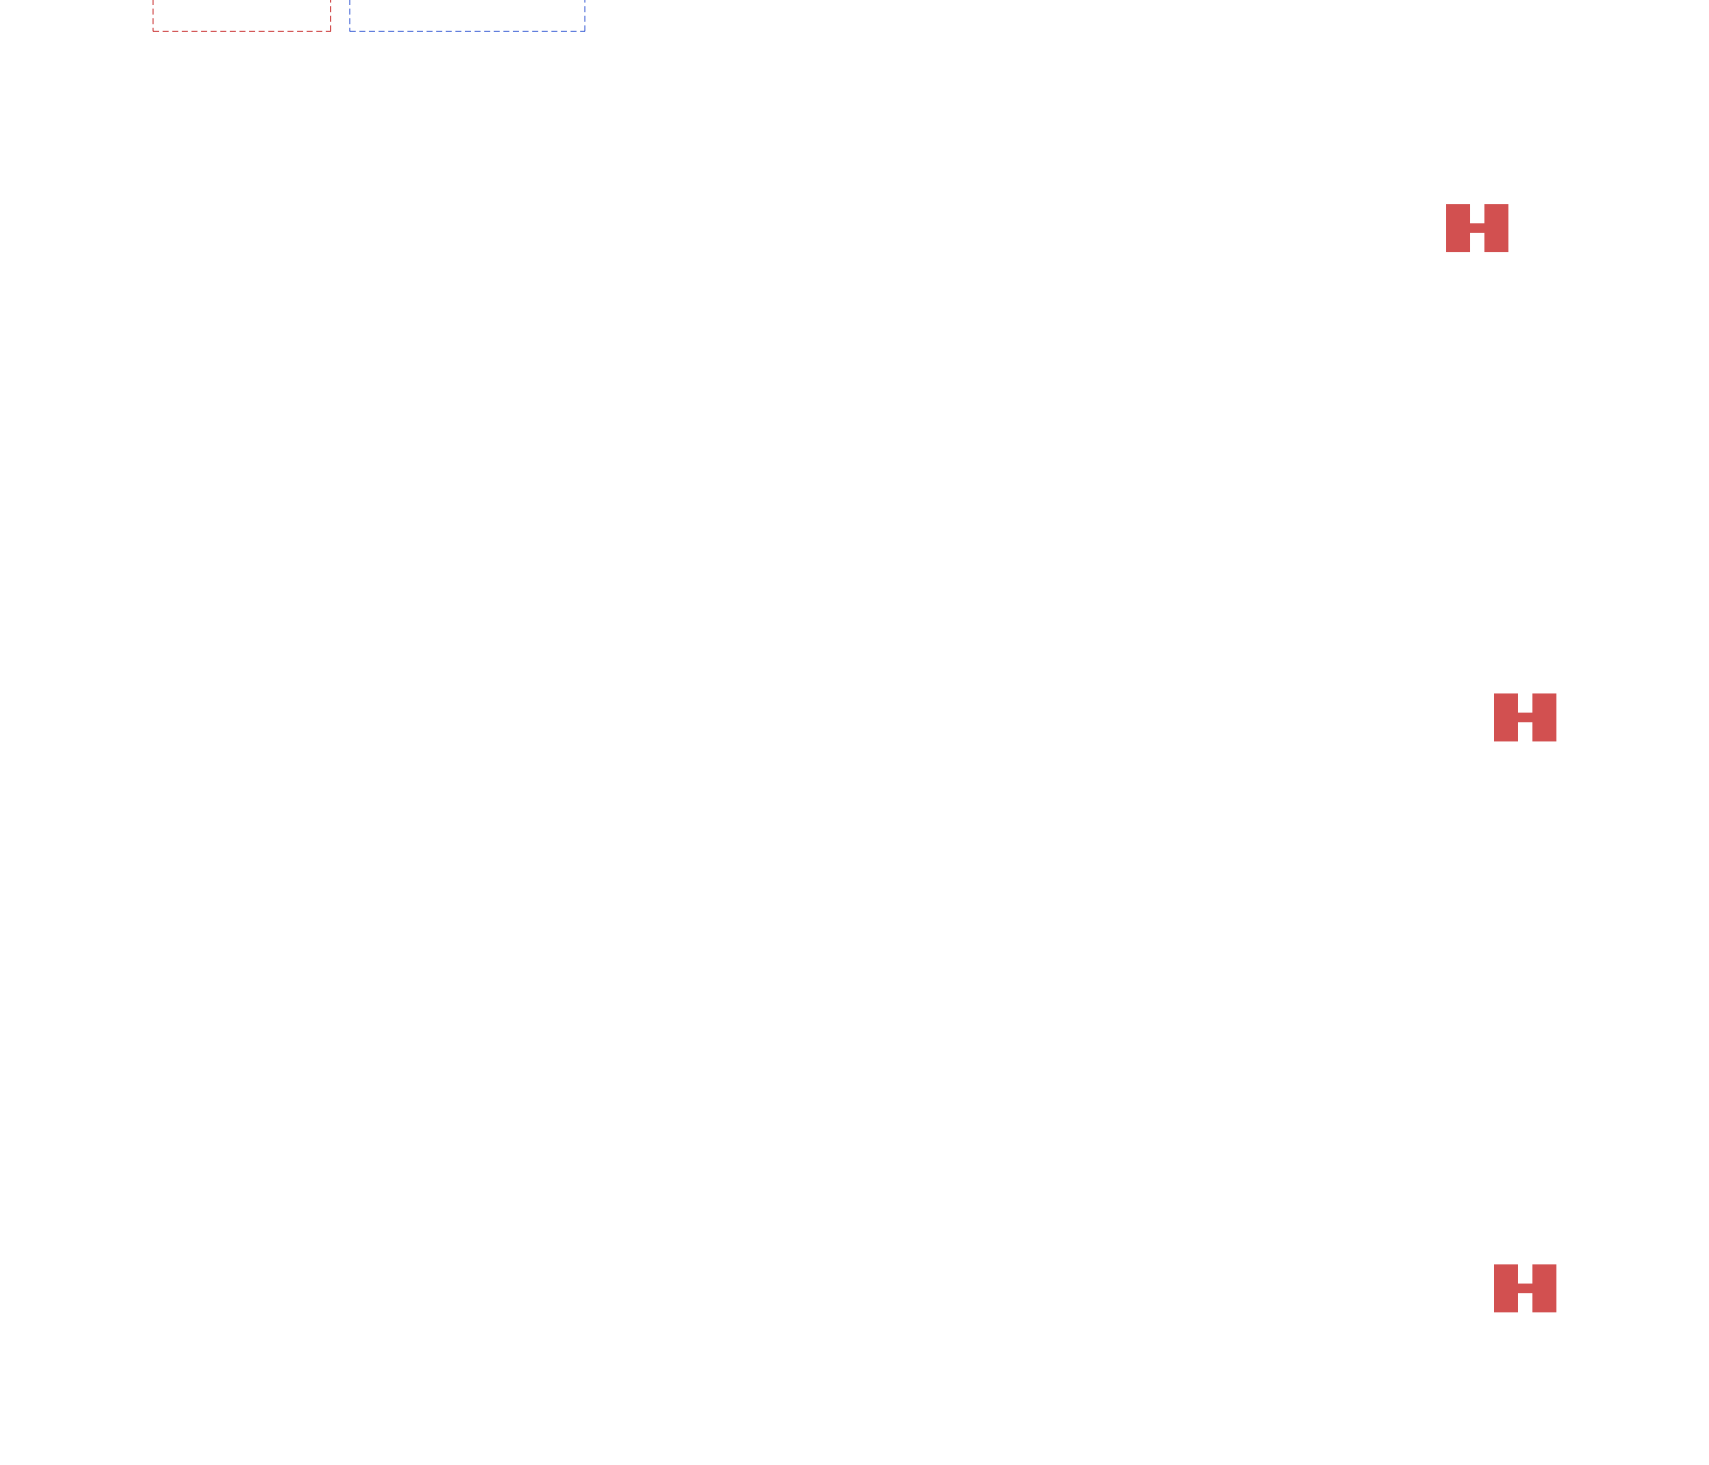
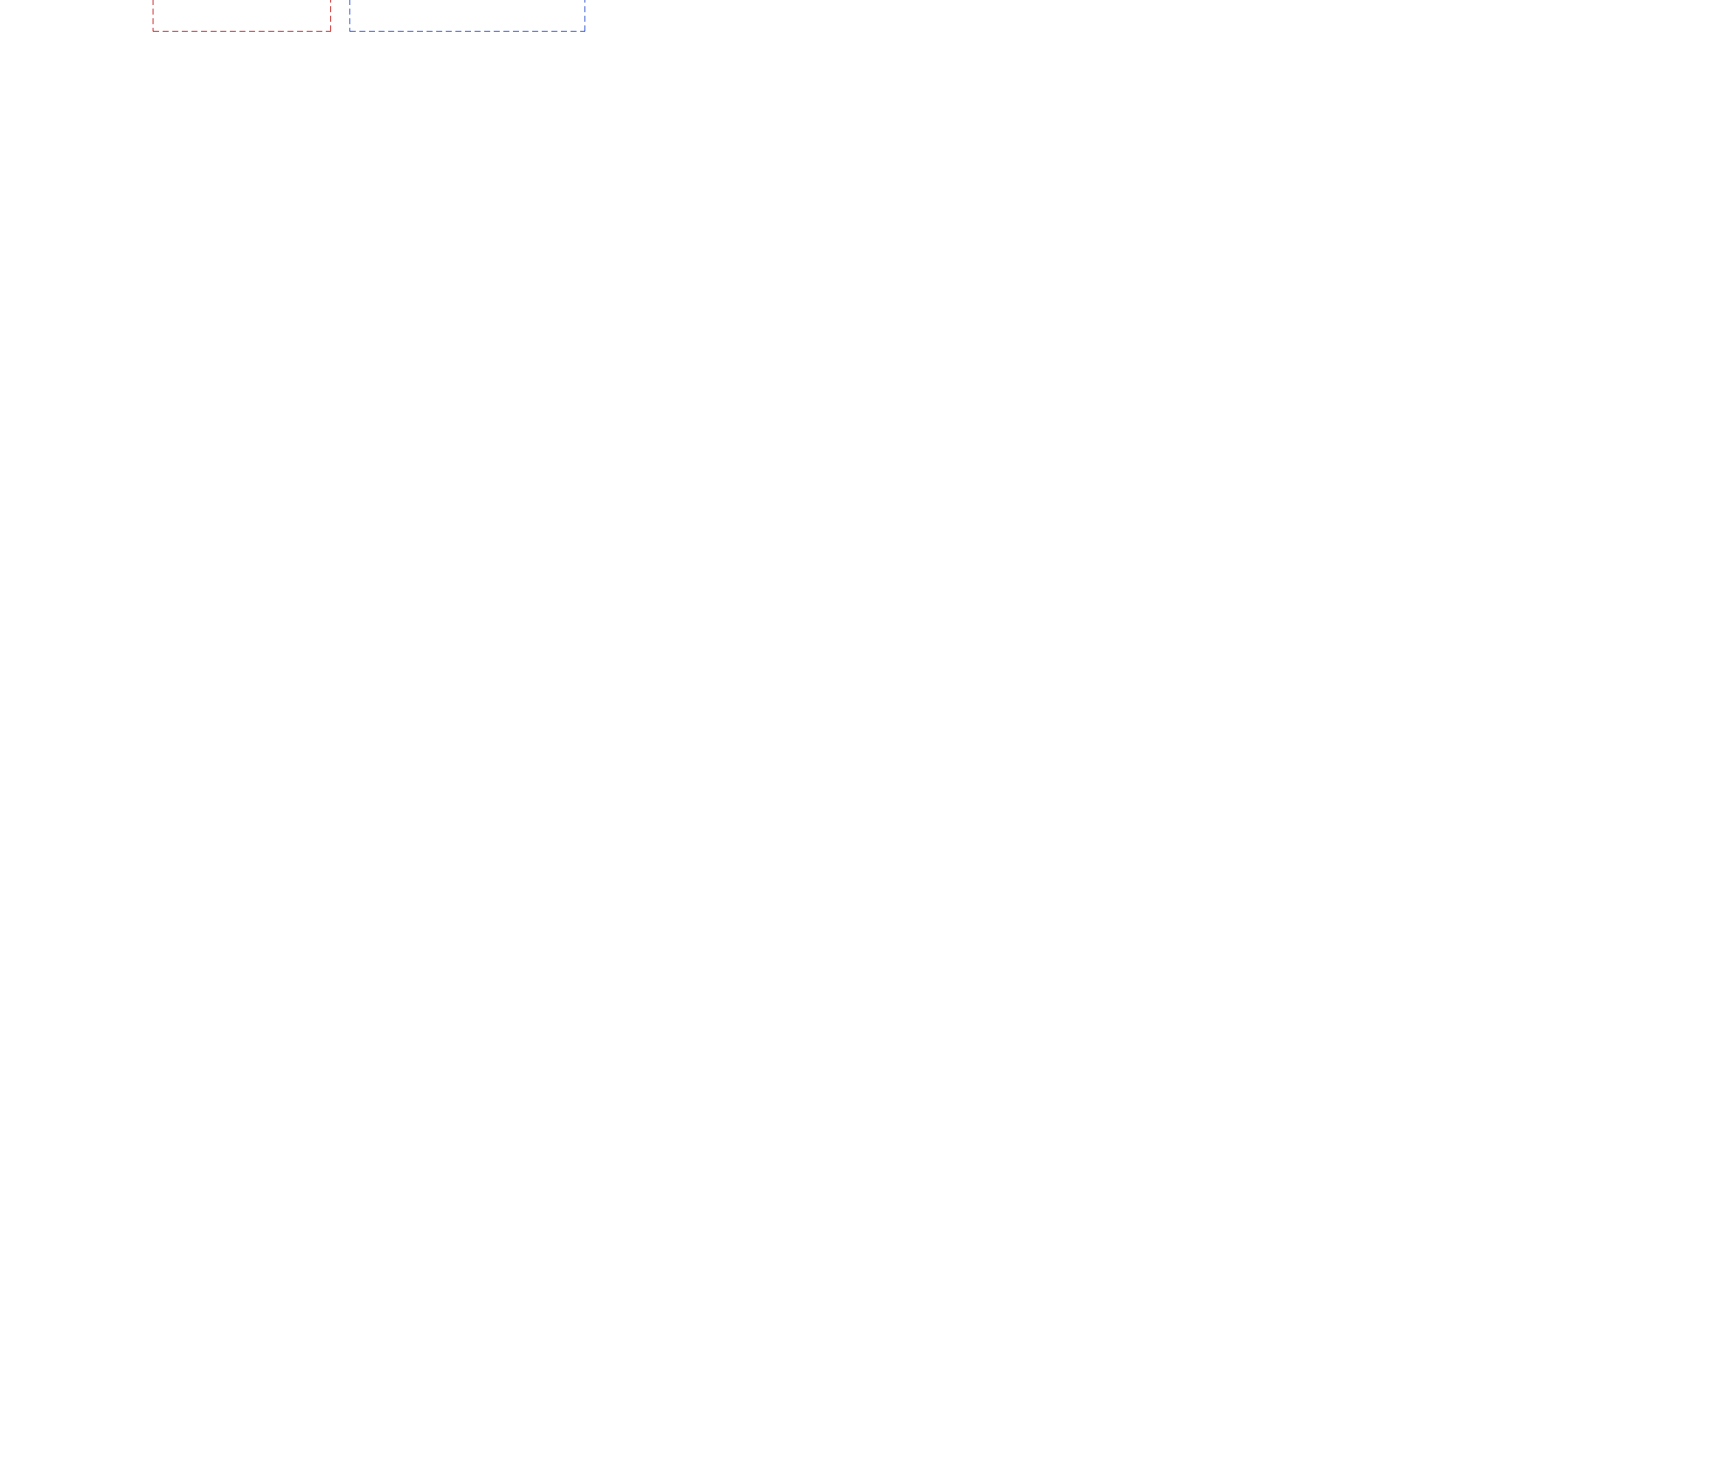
part: (1477, 228) -> none
part: (1525, 717) -> none
part: (1525, 1288) -> none

